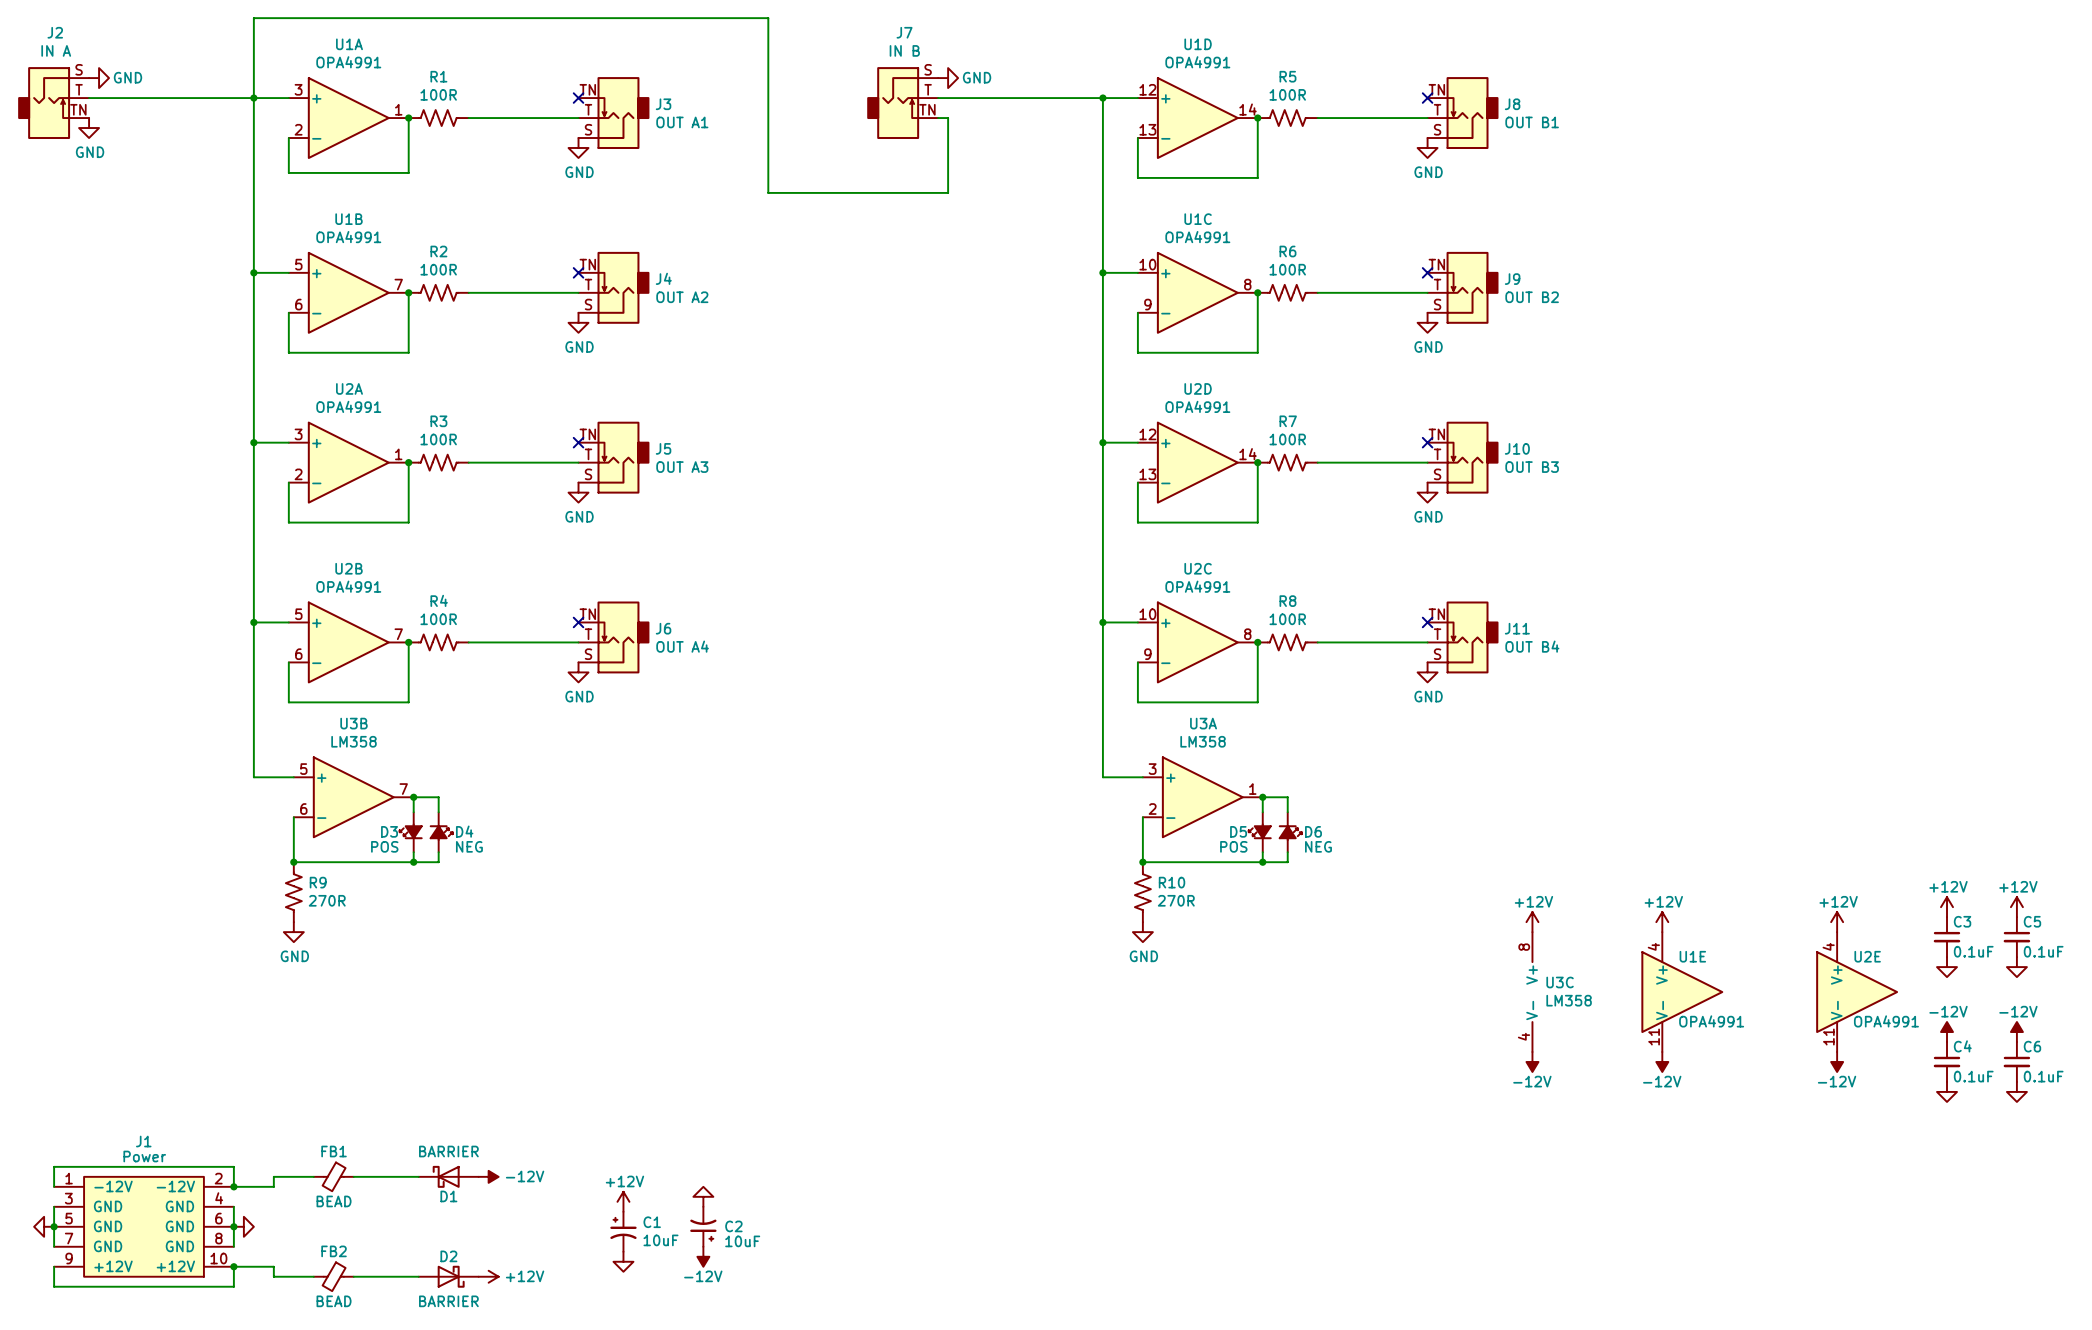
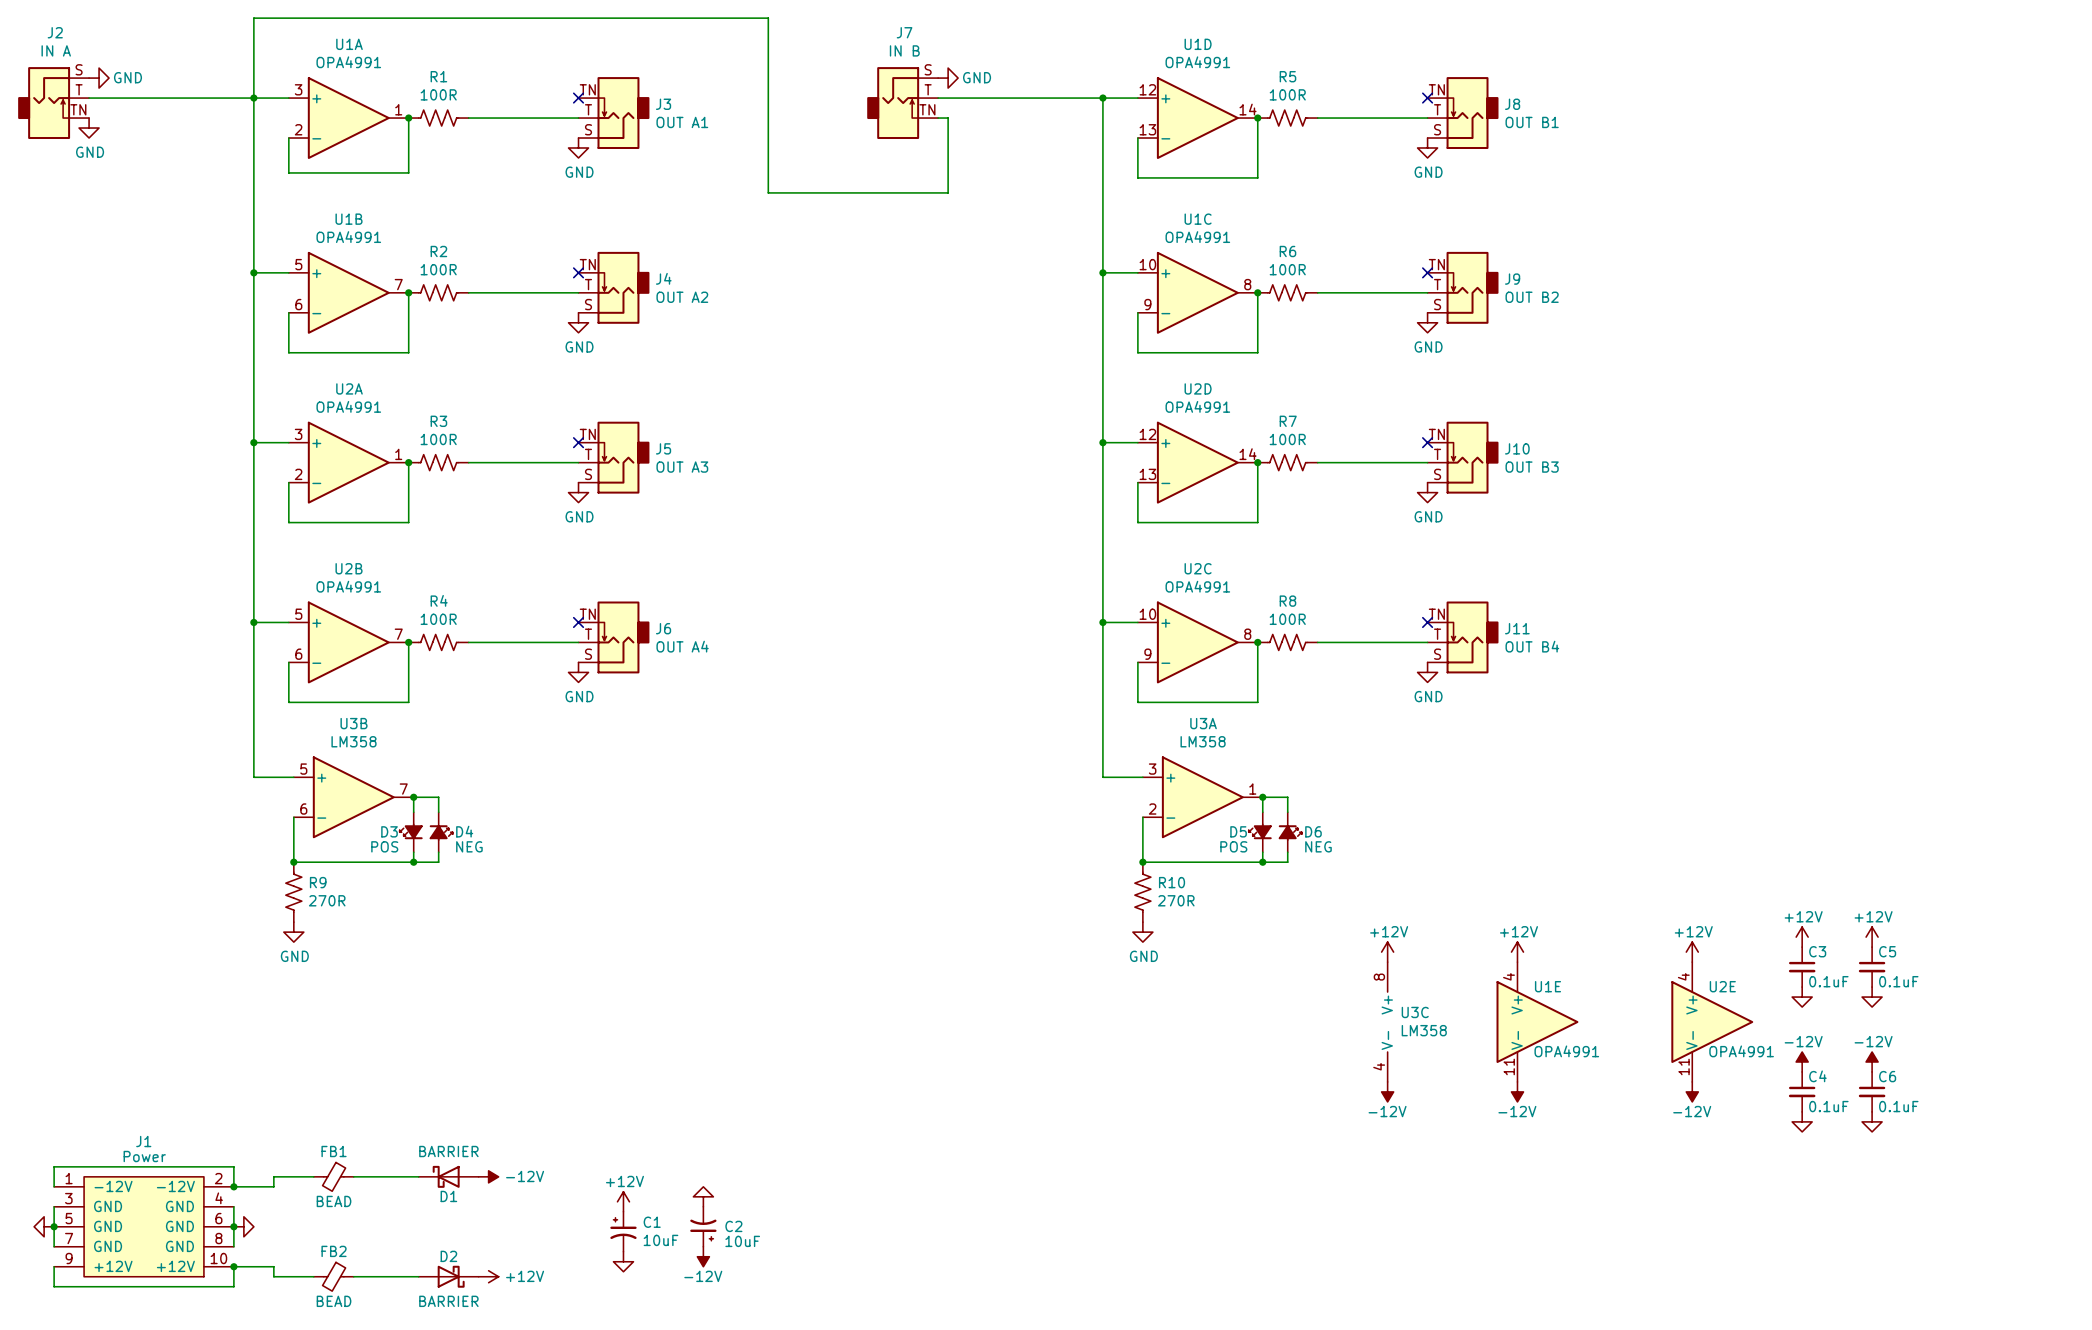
power symbol: +12V (1947, 907) -> none
power symbol: +12V (2016, 907) -> none
power symbol position: +12V (1532, 922) -> +12V (1517, 952)
power symbol position: +12V (1662, 922) -> +12V (1692, 952)
power symbol: +12V (1837, 922) -> none
power symbol: none -> +12V (1802, 937)
power symbol: none -> +12V (1872, 937)
C3 position: (1947, 937) -> (1802, 967)
C5 position: (2016, 937) -> (1872, 967)
power symbol: none -> +12V (1387, 952)
power symbol: (1947, 967) -> none
power symbol: (2016, 967) -> none
U3C position: (1532, 992) -> (1387, 1022)
U1E position: (1682, 992) -> (1537, 1022)
U2E position: (1857, 992) -> (1712, 1022)
power symbol: none -> (1802, 997)
power symbol: none -> (1872, 997)
power symbol: -12V (1947, 1032) -> none
power symbol: -12V (2016, 1032) -> none
power symbol position: -12V (1532, 1061) -> -12V (1517, 1091)
power symbol position: -12V (1662, 1061) -> -12V (1692, 1091)
power symbol: none -> -12V (1802, 1061)
power symbol: -12V (1837, 1061) -> none
power symbol: none -> -12V (1872, 1061)
C4 position: (1947, 1061) -> (1802, 1091)
C6 position: (2016, 1061) -> (1872, 1091)
power symbol: none -> -12V (1387, 1091)
power symbol: (1947, 1091) -> none
power symbol: (2016, 1091) -> none
power symbol: none -> (1802, 1121)
power symbol: none -> (1872, 1121)

